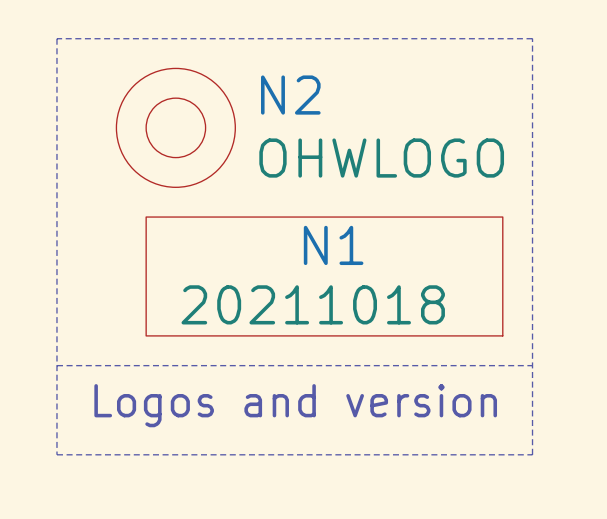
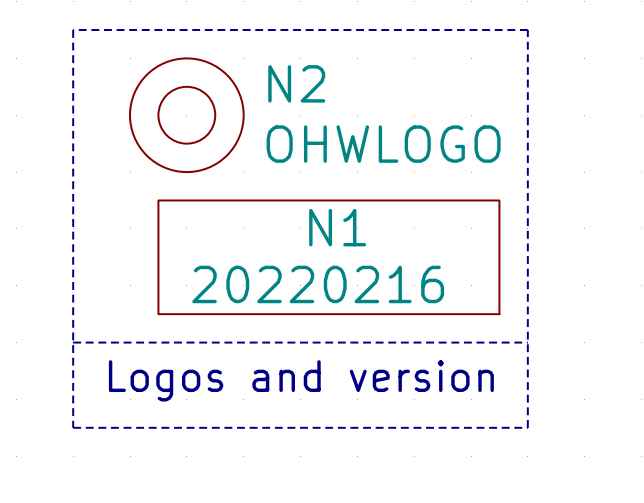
N1 value: 20211018 (313, 304) -> 20220216 (318, 284)

